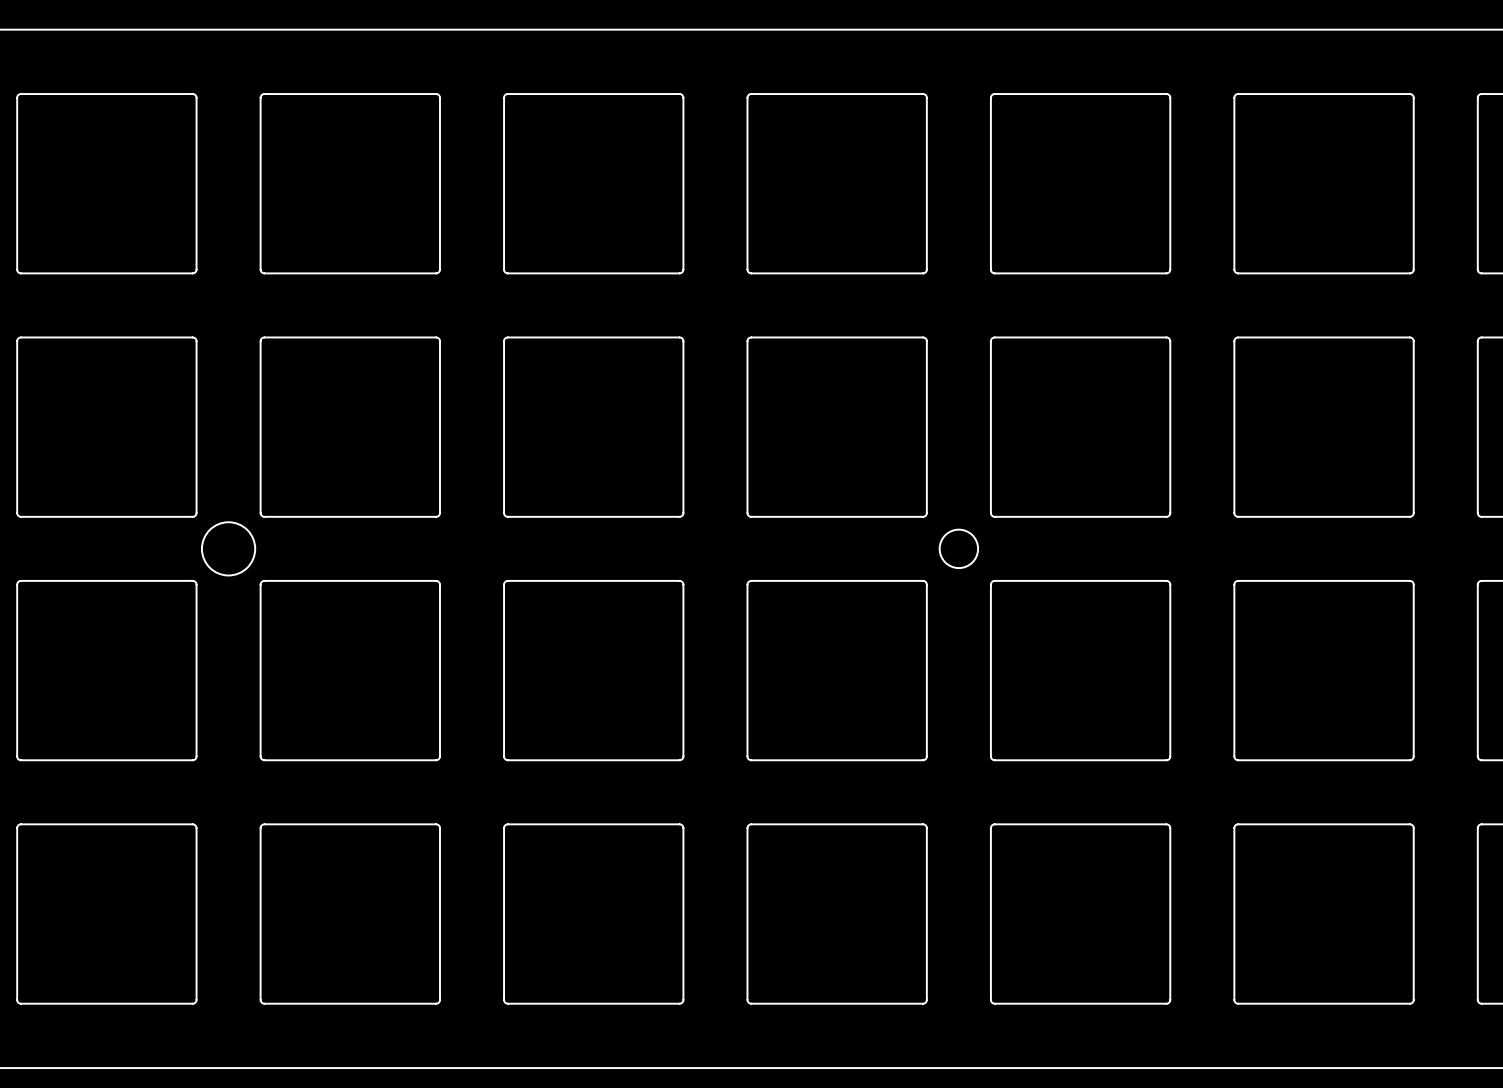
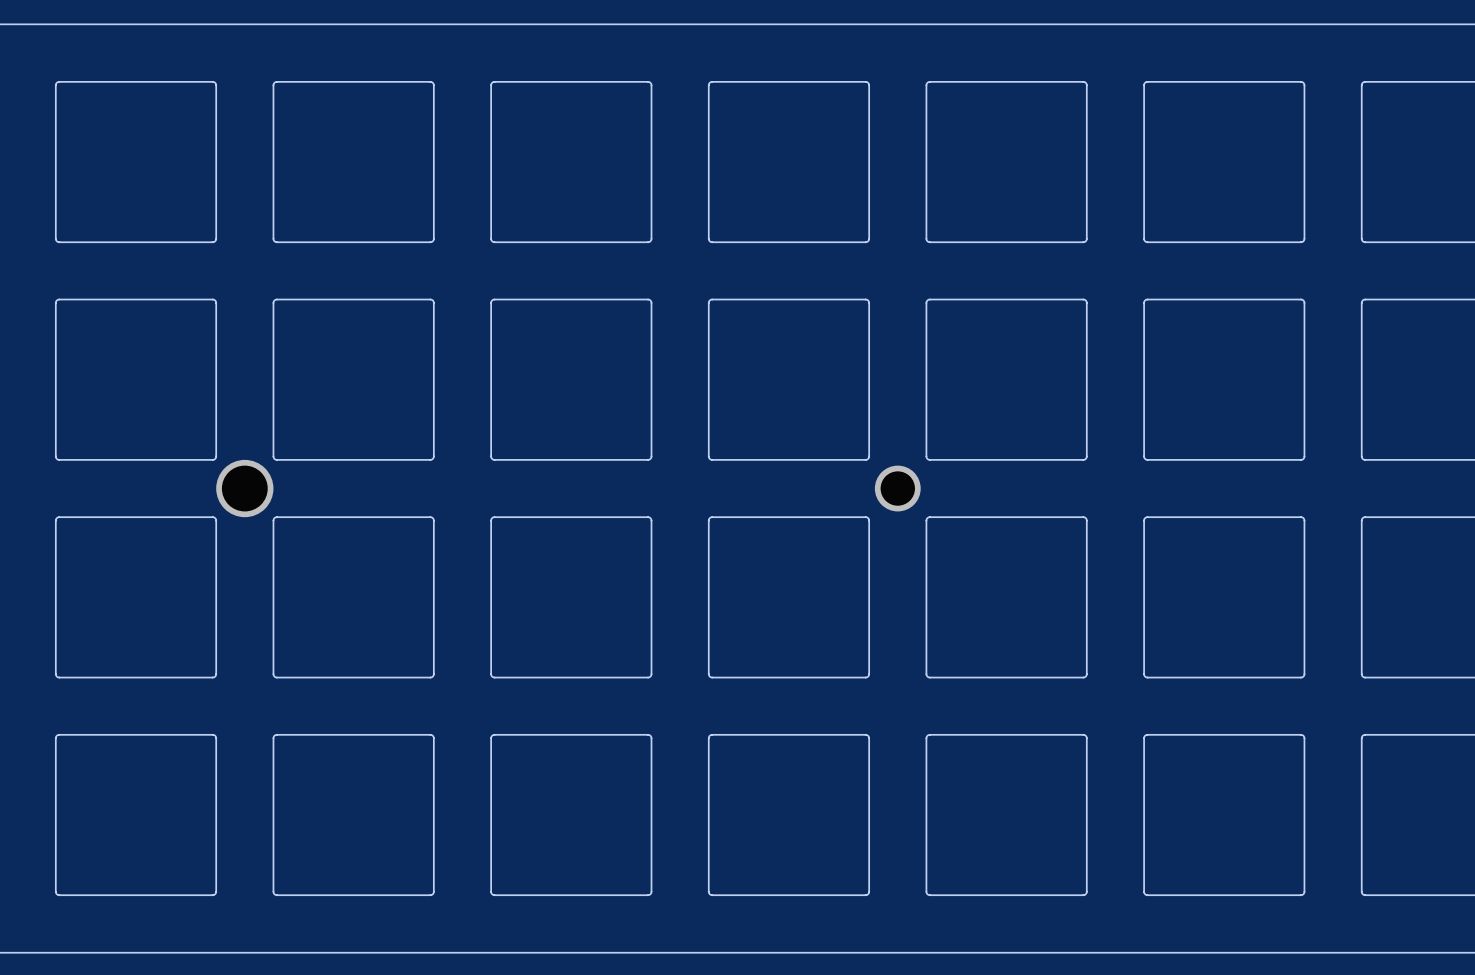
round board edge: [200, 521, 257, 577] -> none
round board edge: [938, 528, 980, 570] -> none
via: none -> (244, 488)
via: none -> (897, 488)

